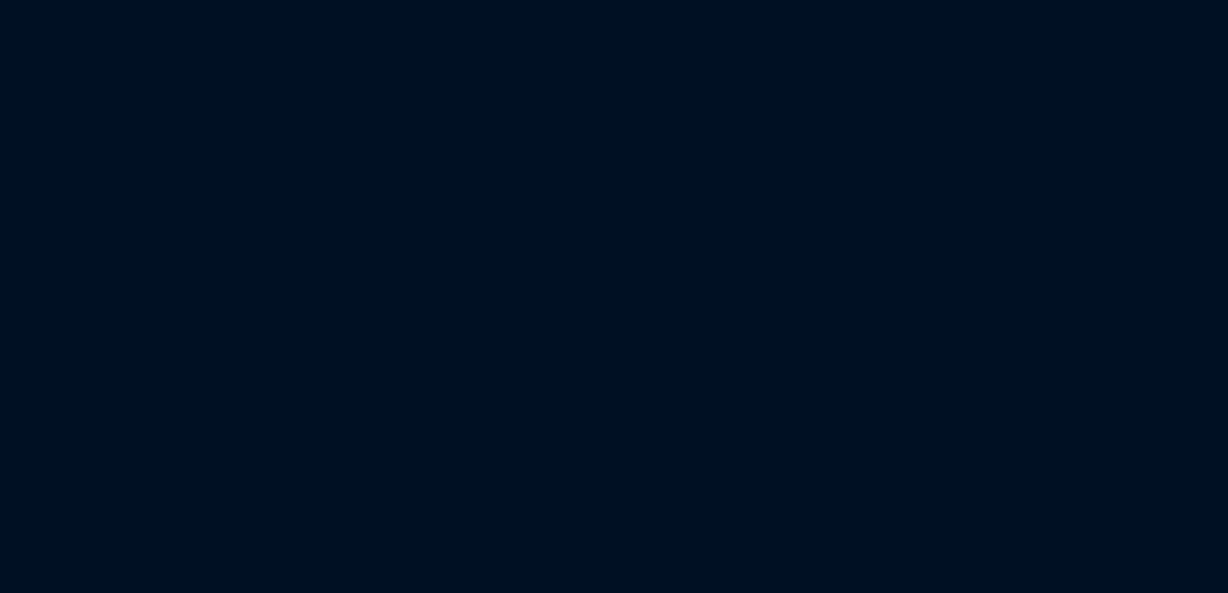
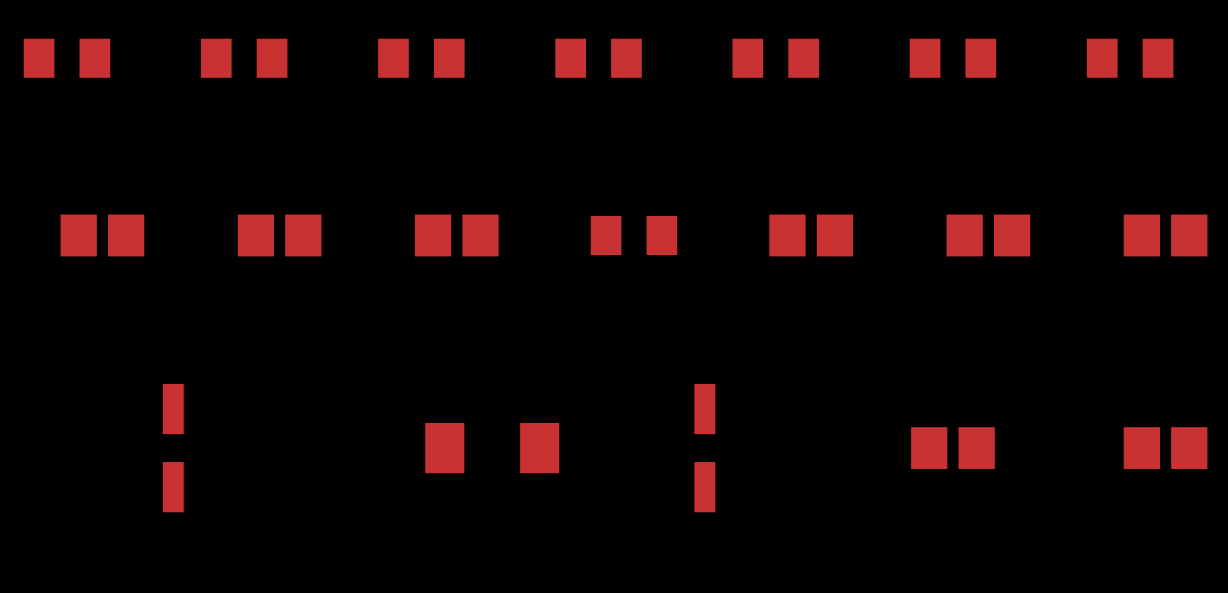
part: none -> (66, 58)
part: none -> (244, 58)
part: none -> (421, 58)
part: none -> (598, 58)
part: none -> (775, 58)
part: none -> (952, 58)
part: none -> (1130, 58)
part: none -> (102, 235)
part: none -> (279, 235)
part: none -> (456, 235)
part: none -> (633, 235)
part: none -> (811, 235)
part: none -> (988, 235)
part: none -> (1165, 235)
part: none -> (173, 448)
part: none -> (492, 448)
part: none -> (704, 448)
part: none -> (952, 448)
part: none -> (1165, 448)

